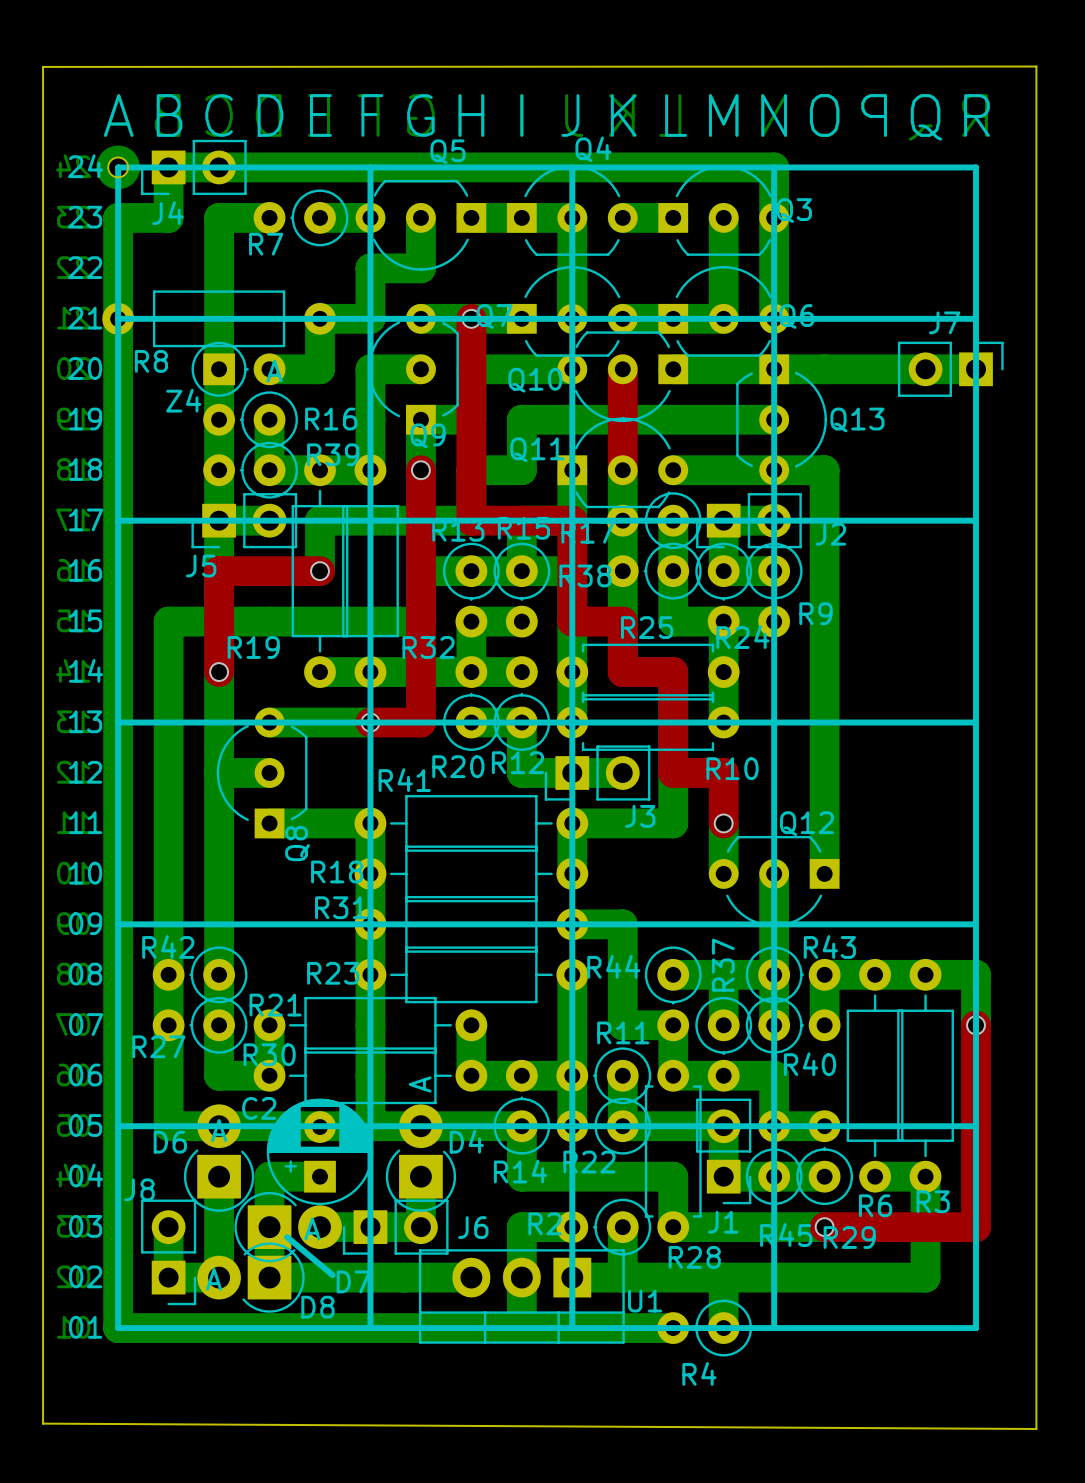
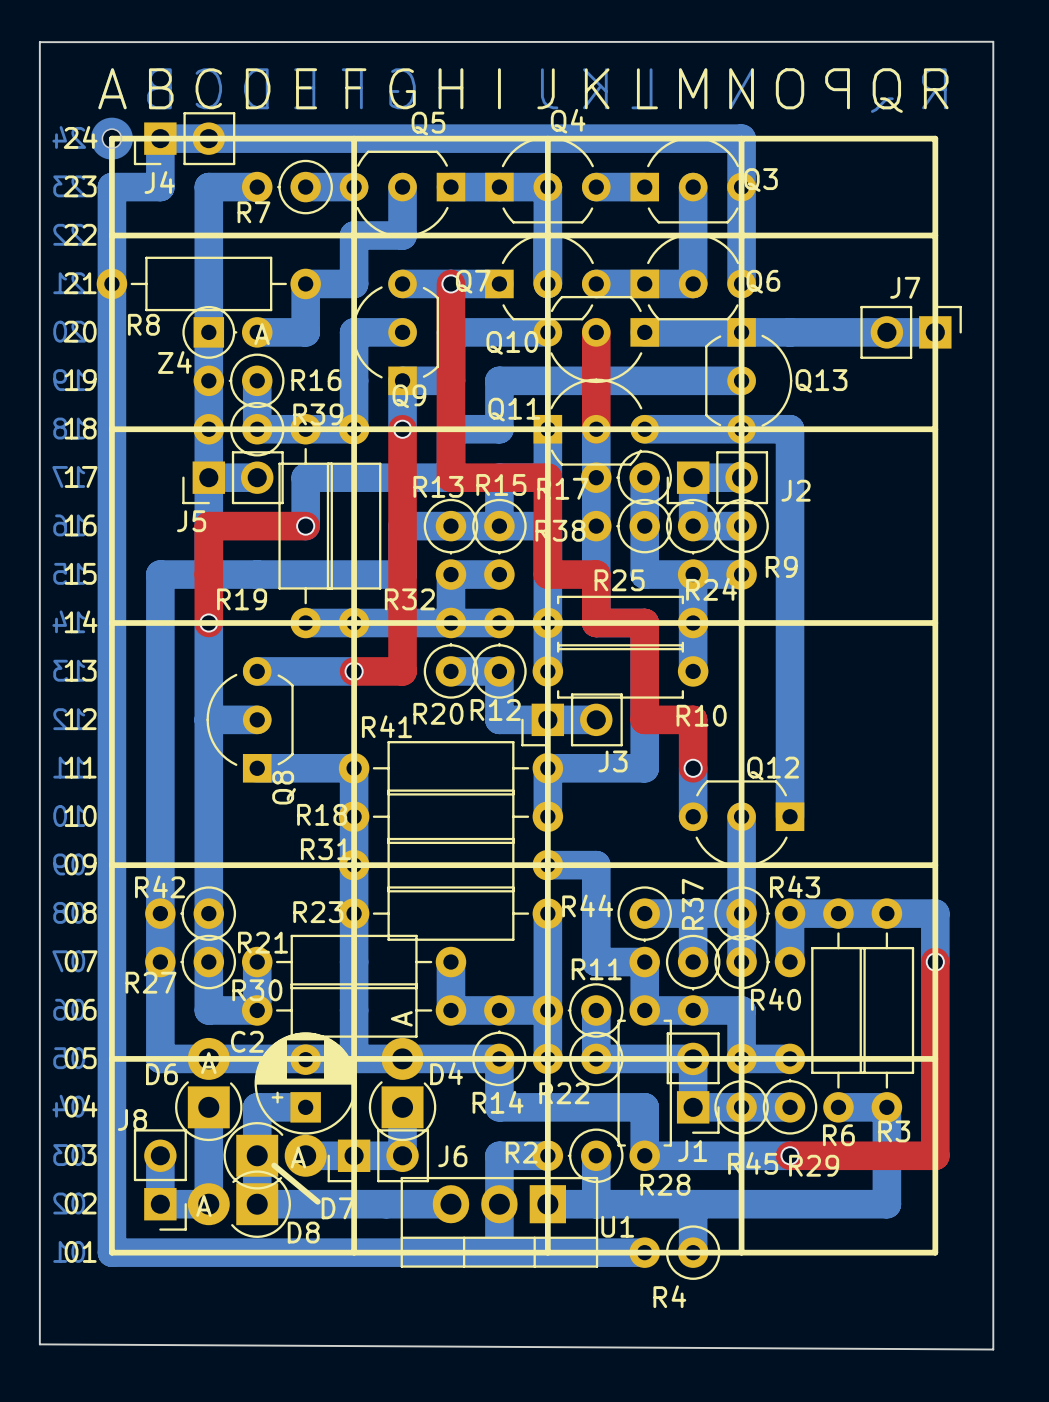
line: (118, 318) (976, 318) -> (111, 235) (935, 235)
line: (118, 520) (976, 520) -> (111, 429) (935, 429)
line: (118, 722) (976, 722) -> (111, 622) (935, 622)

